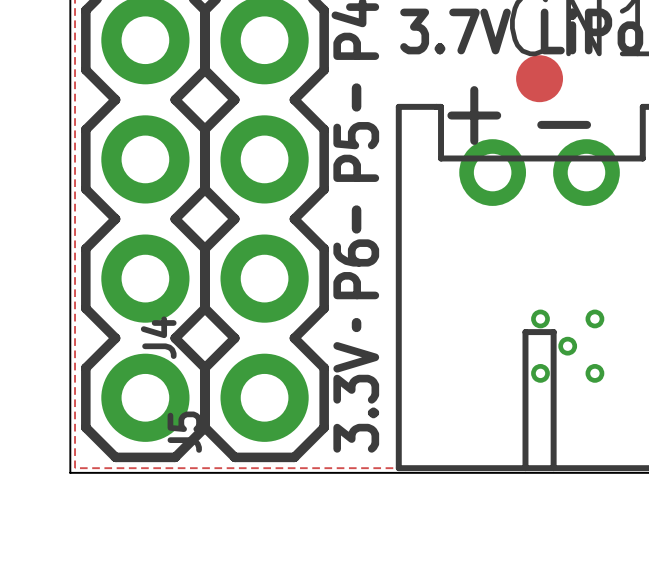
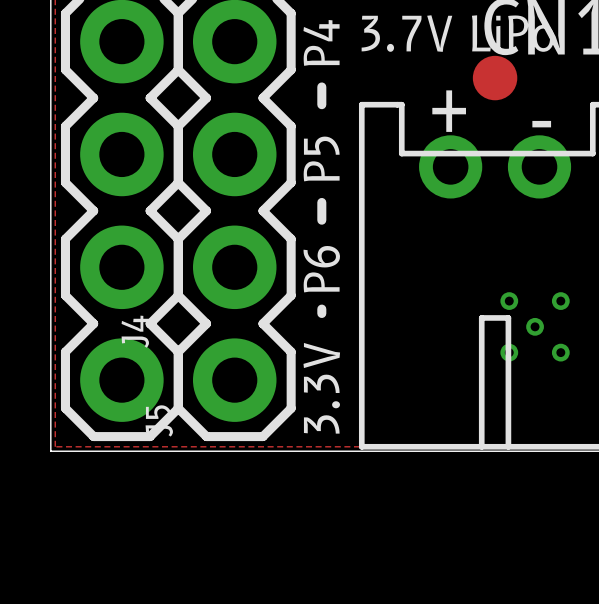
part position: (567, 346) -> (535, 326)

